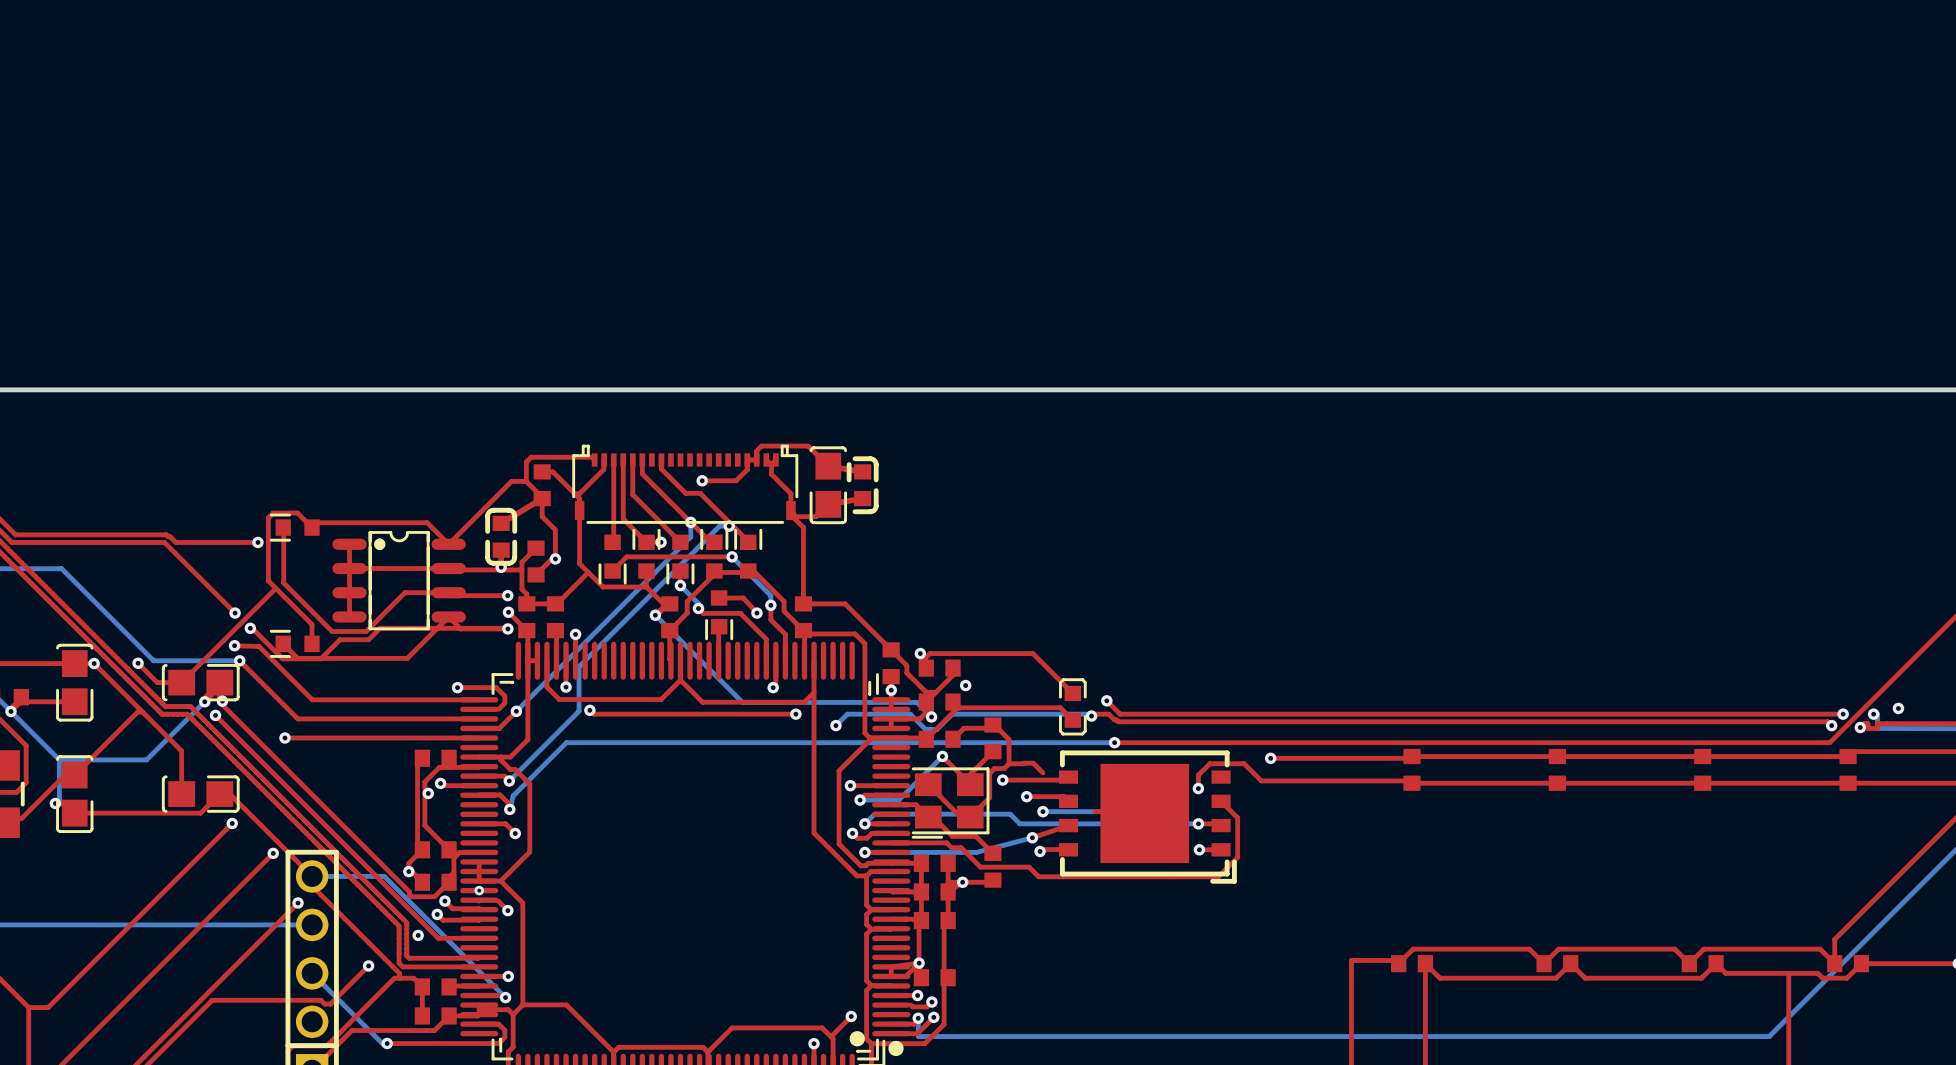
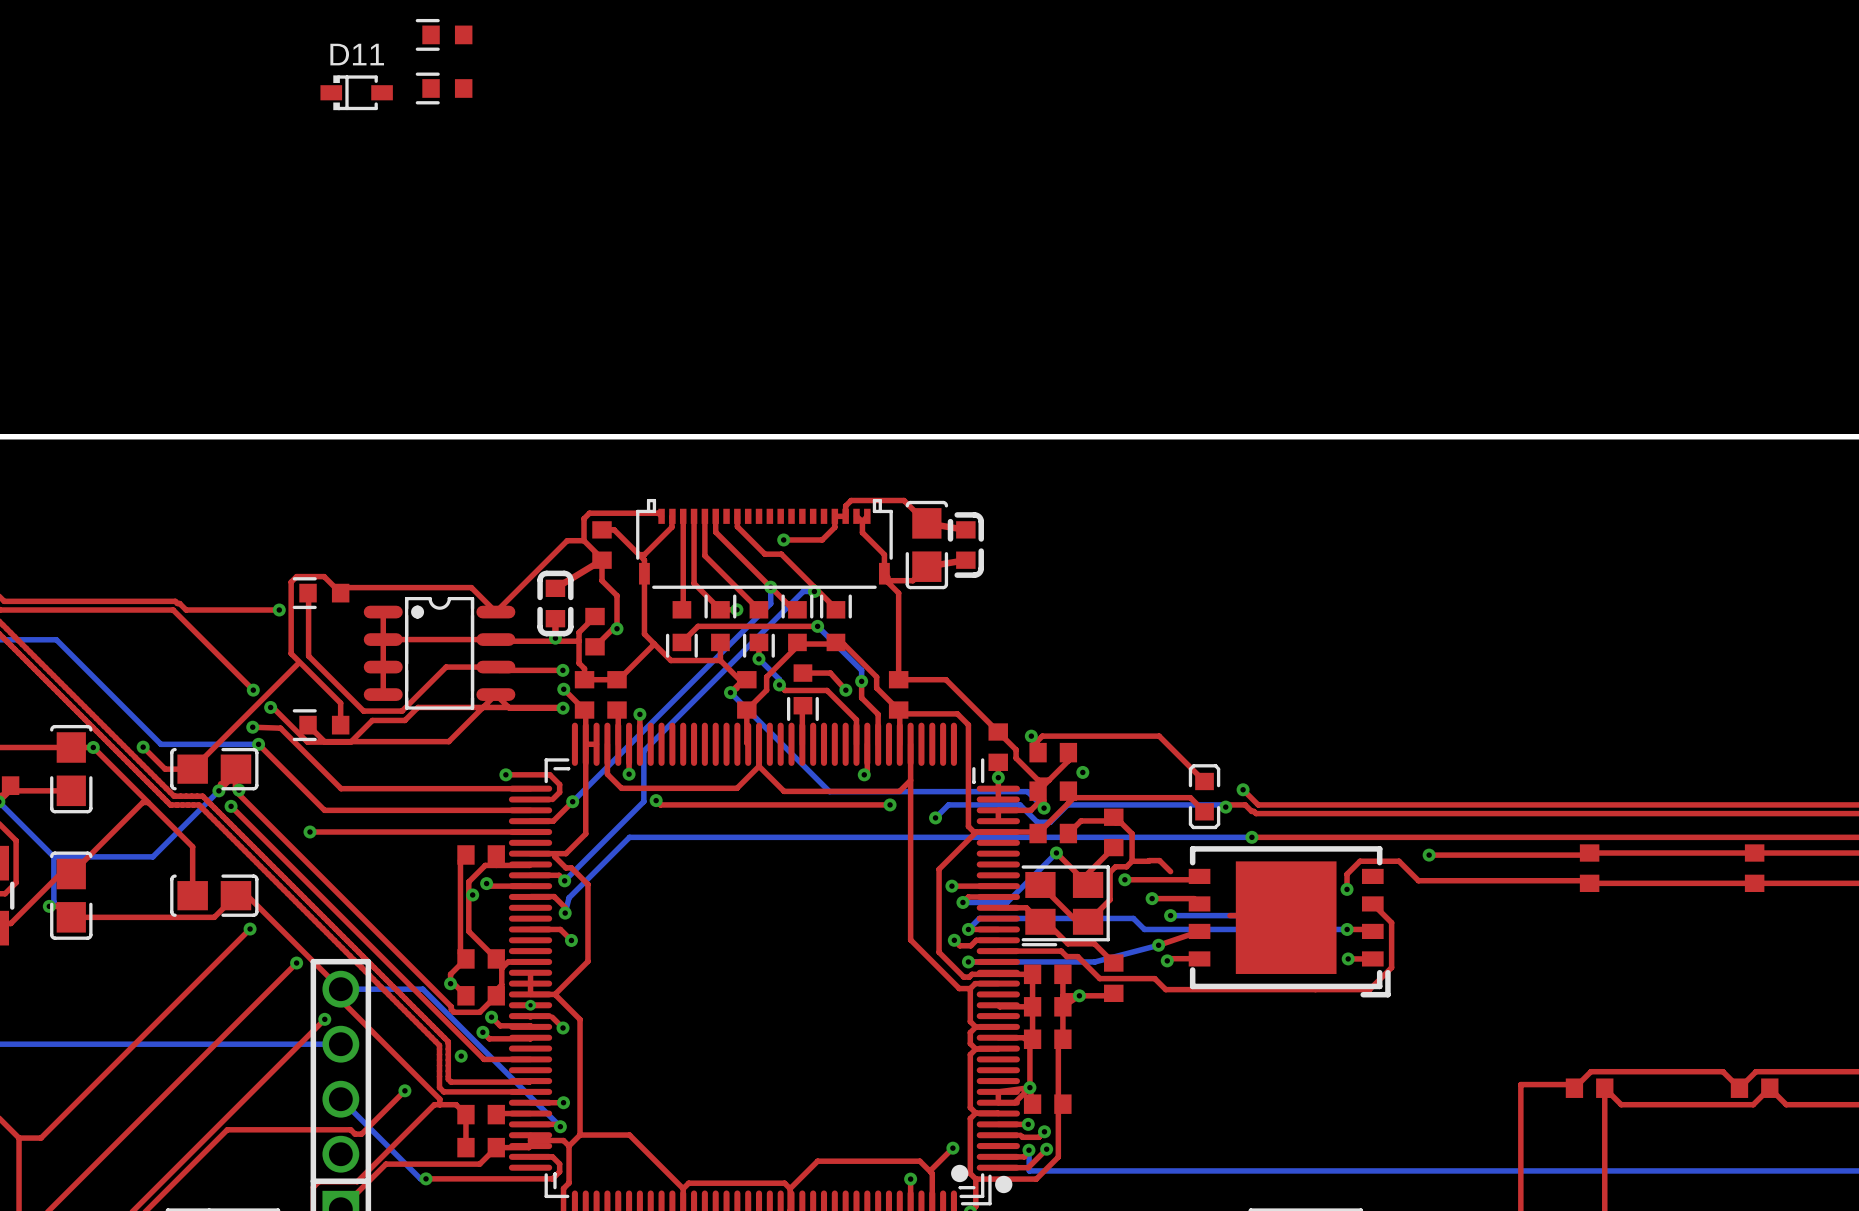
part: none -> (444, 34)
part: none -> (444, 88)
D11: none -> (356, 92)

